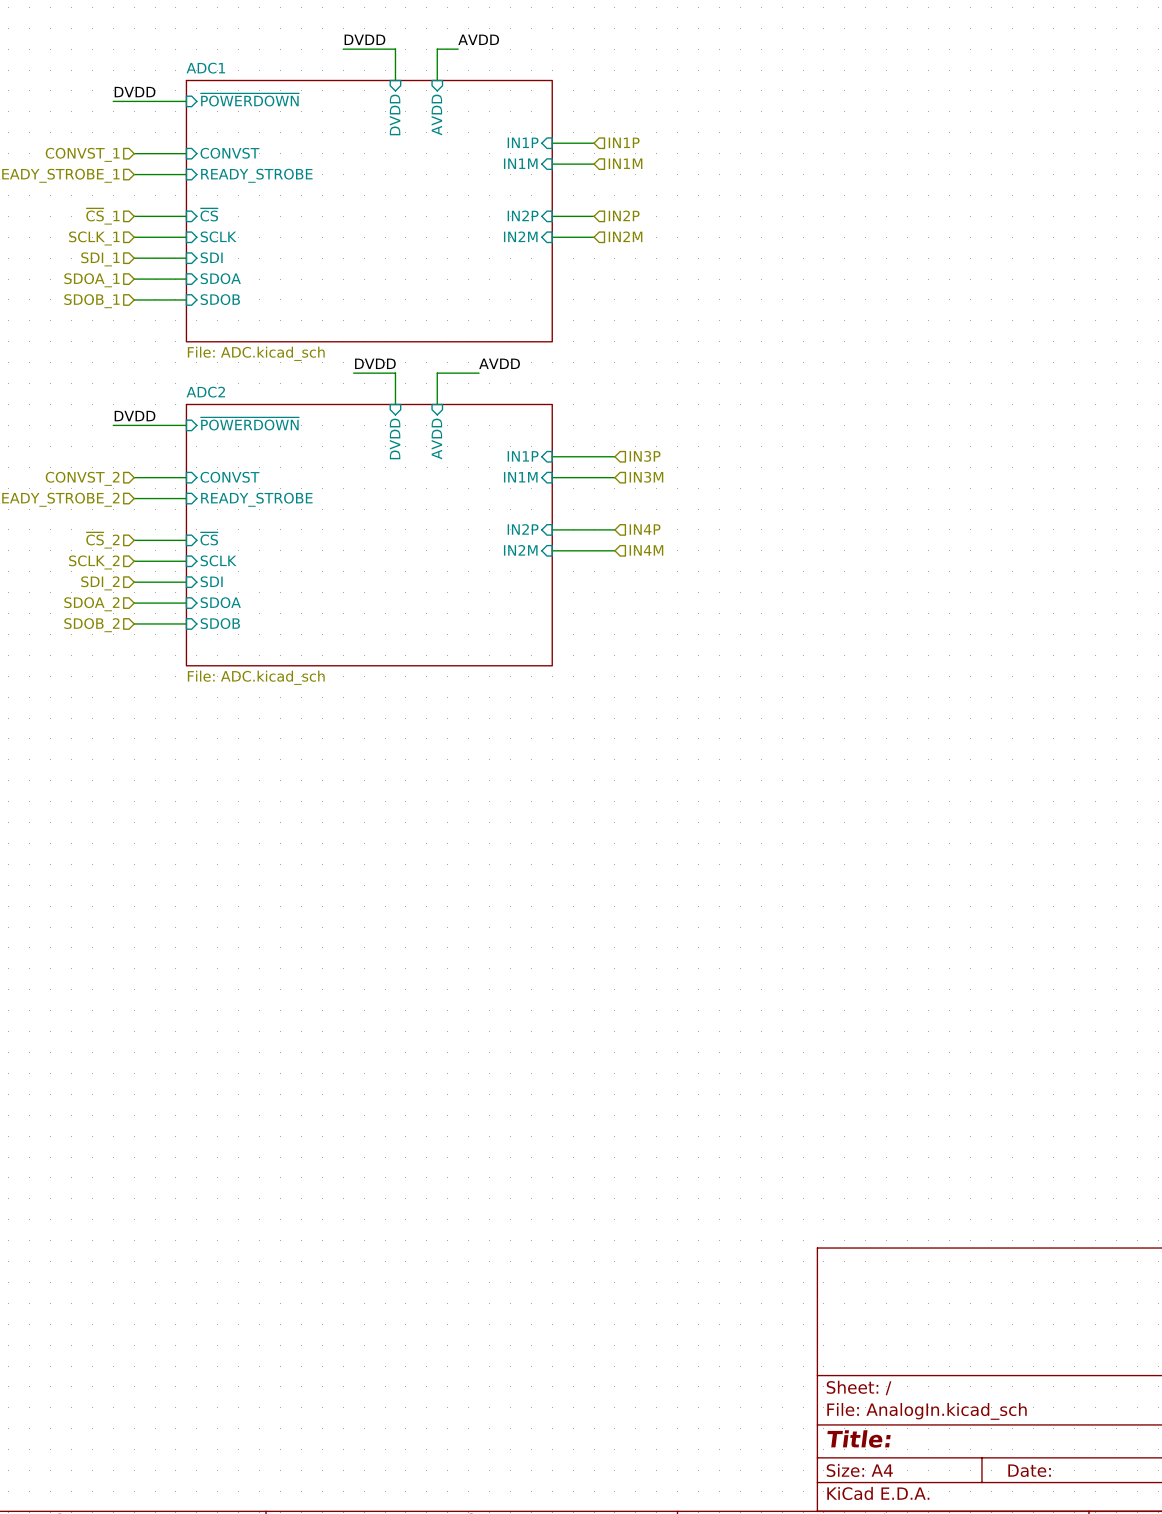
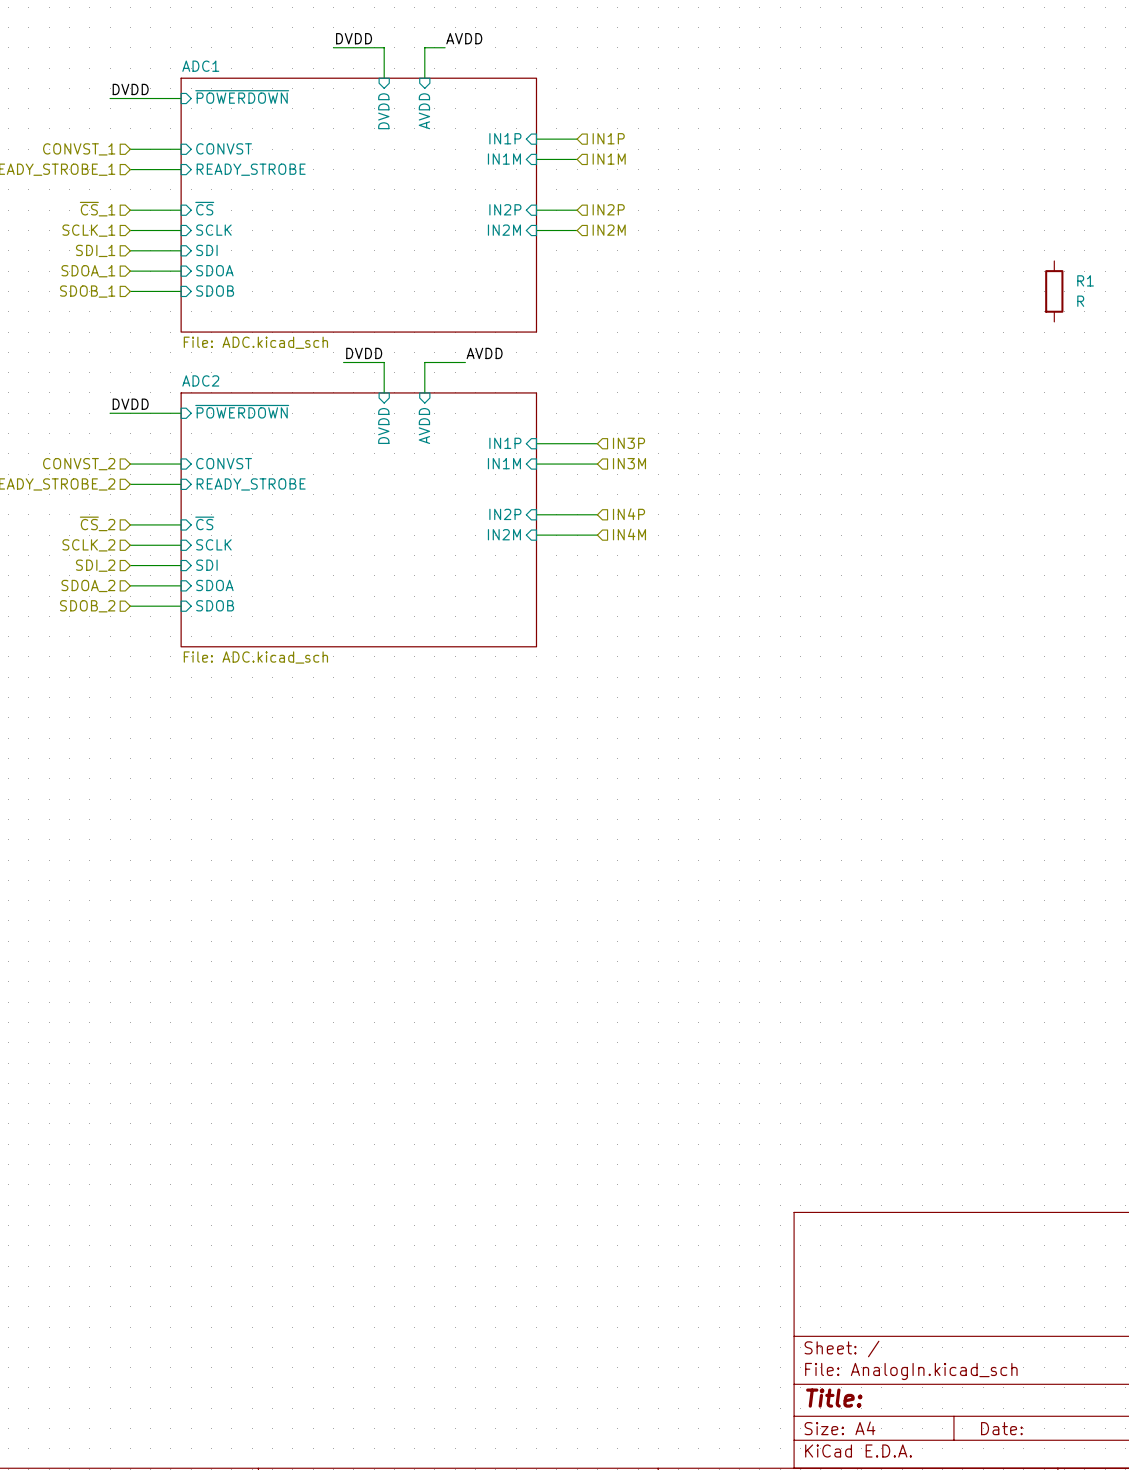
R1: none -> R (1054, 291)

